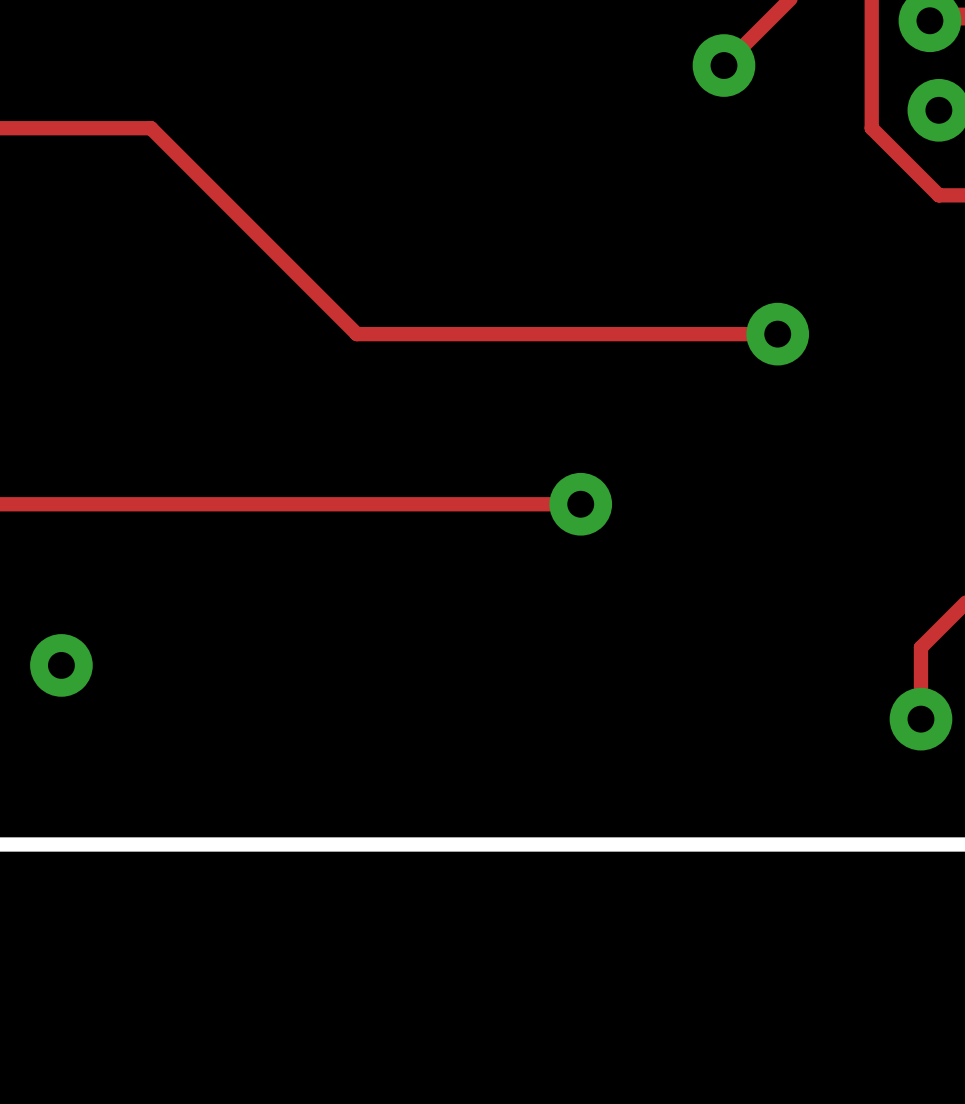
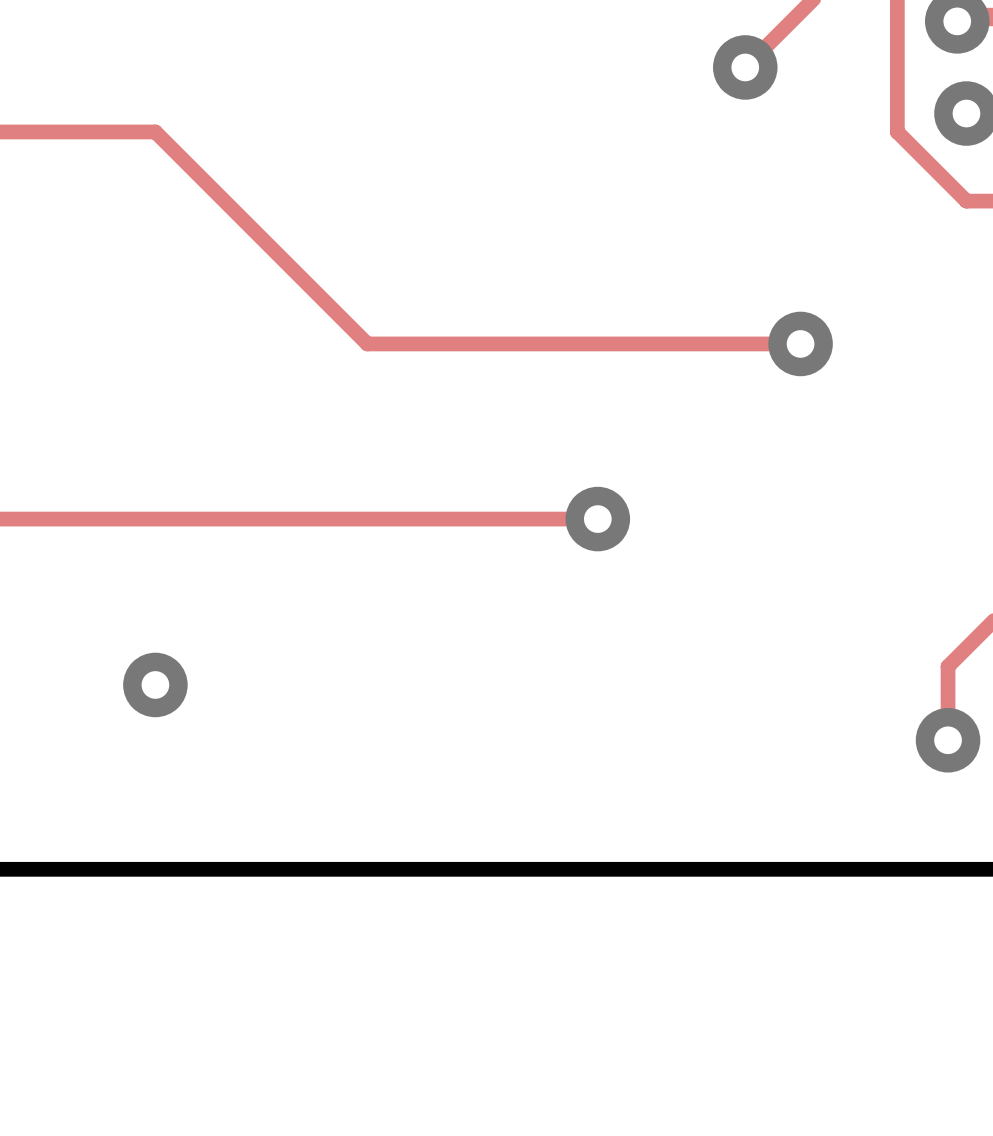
via position: (61, 665) -> (155, 684)

